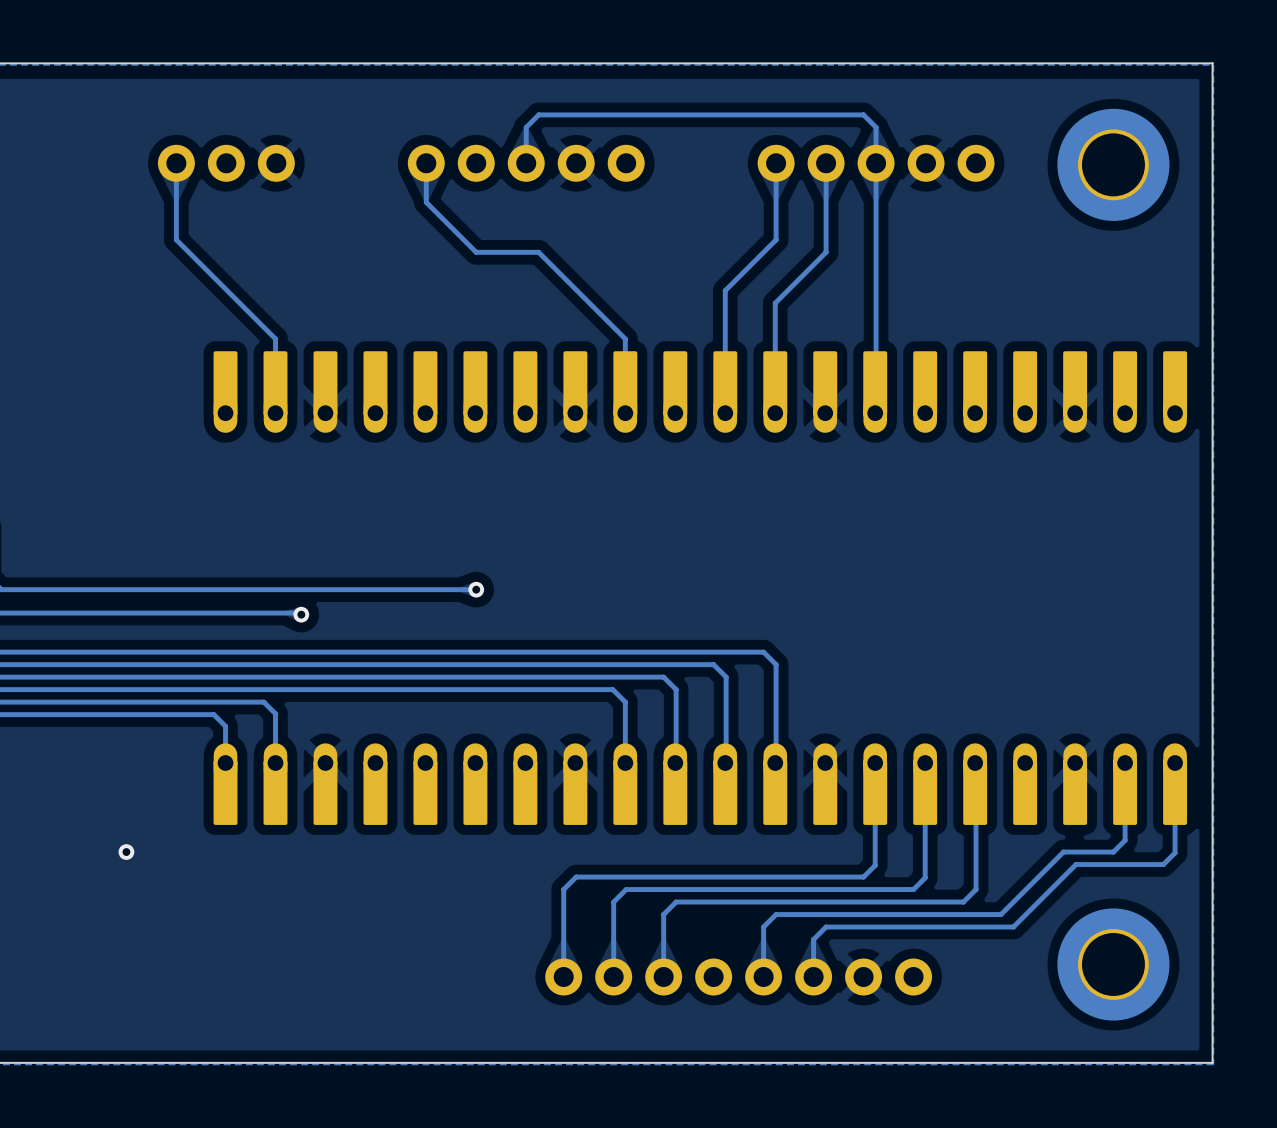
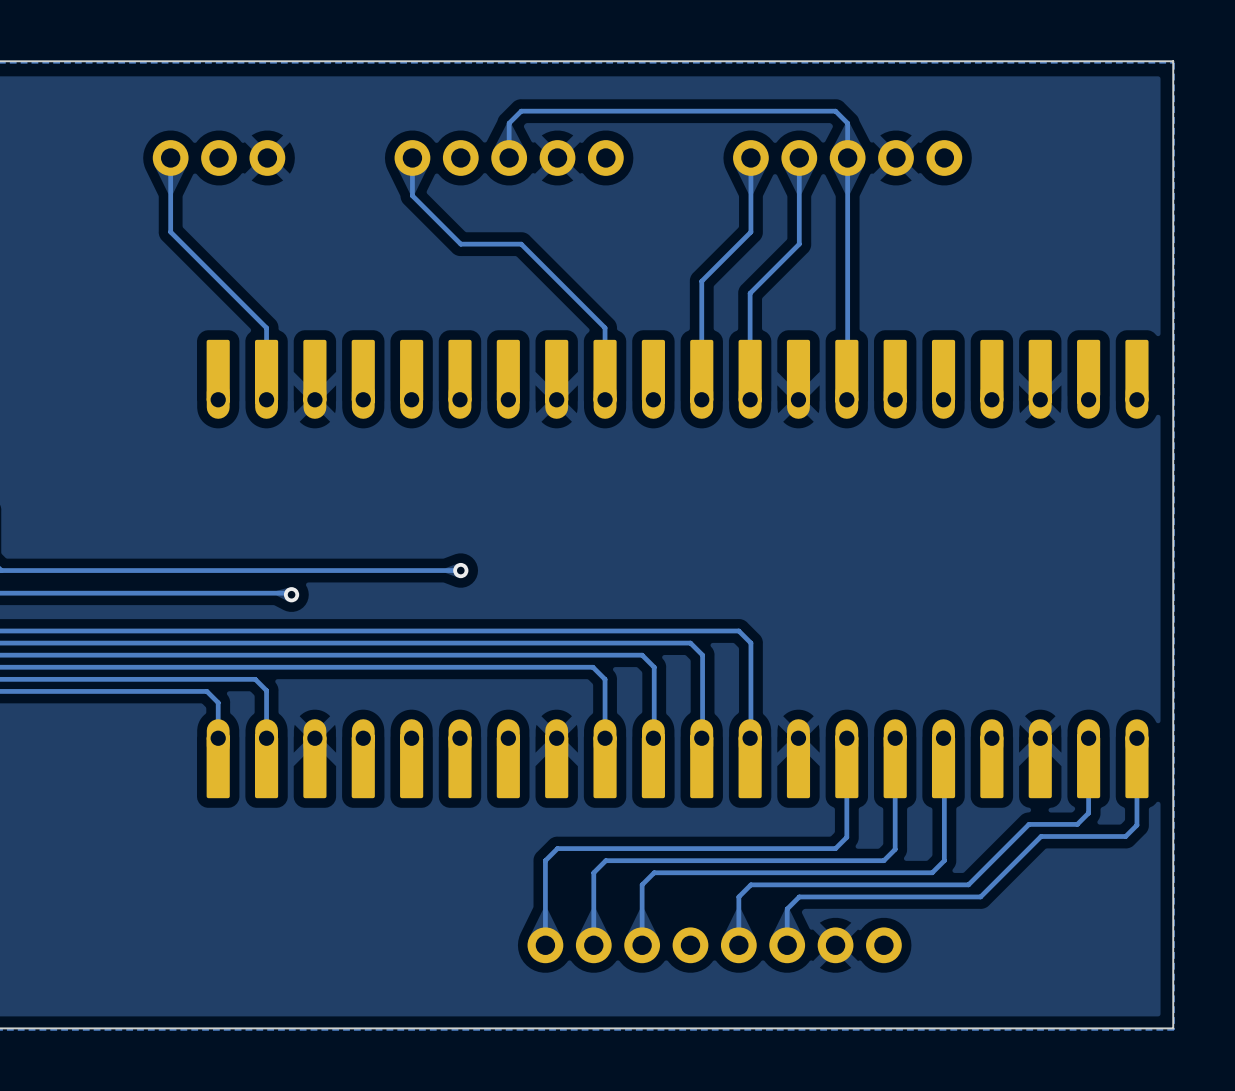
part: (1113, 164) -> none
via: (126, 852) -> none
part: (1113, 964) -> none

